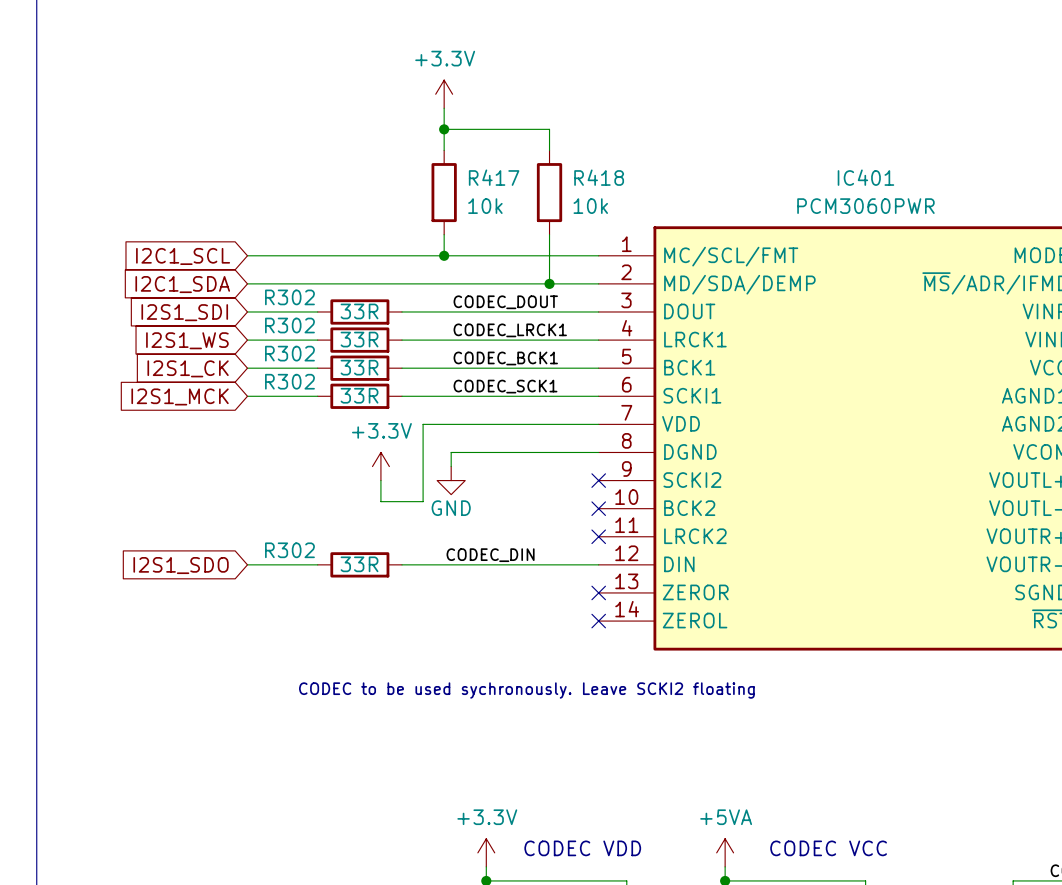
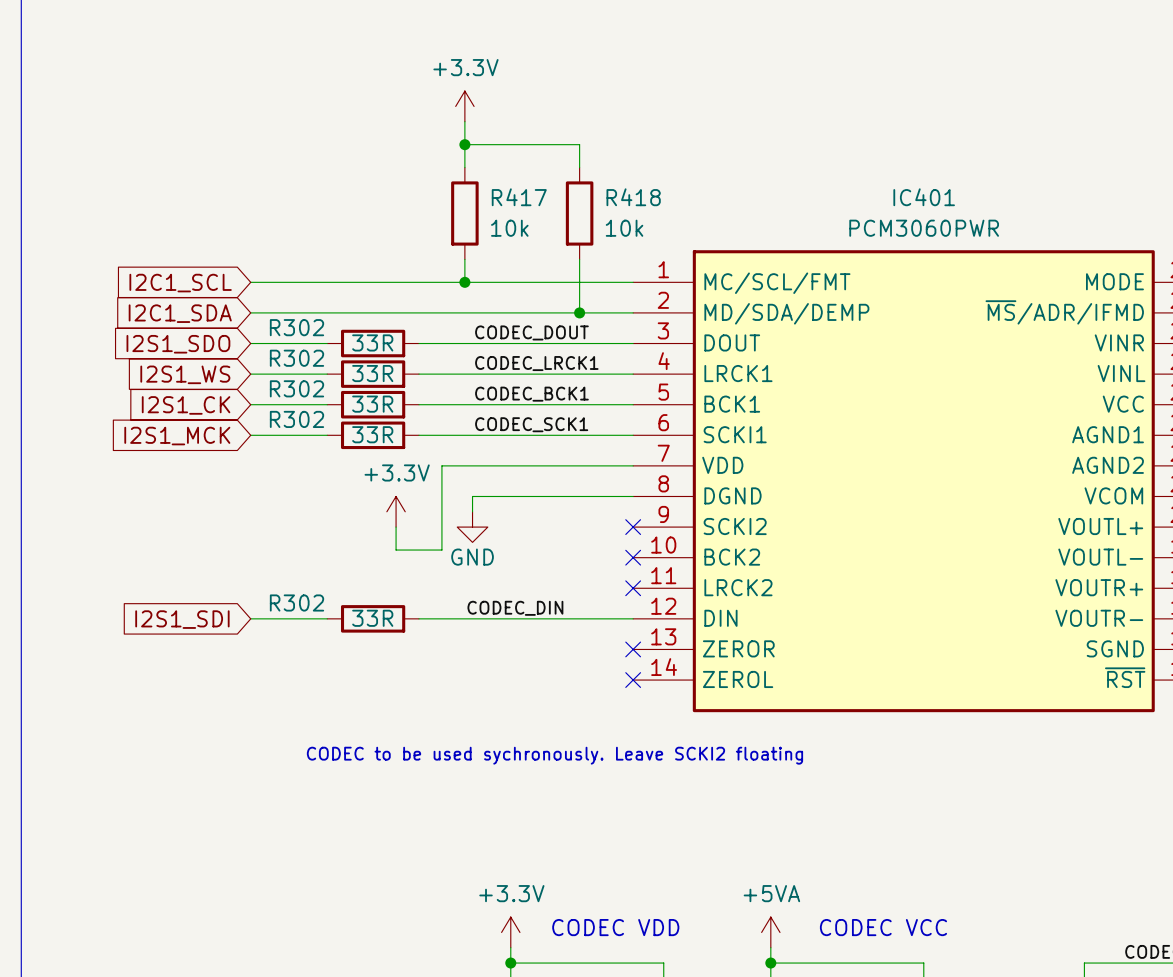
global label: I2S1_SDI (184, 312) -> I2S1_SDO (178, 344)
global label: I2S1_SDO (181, 565) -> I2S1_SDI (182, 619)

